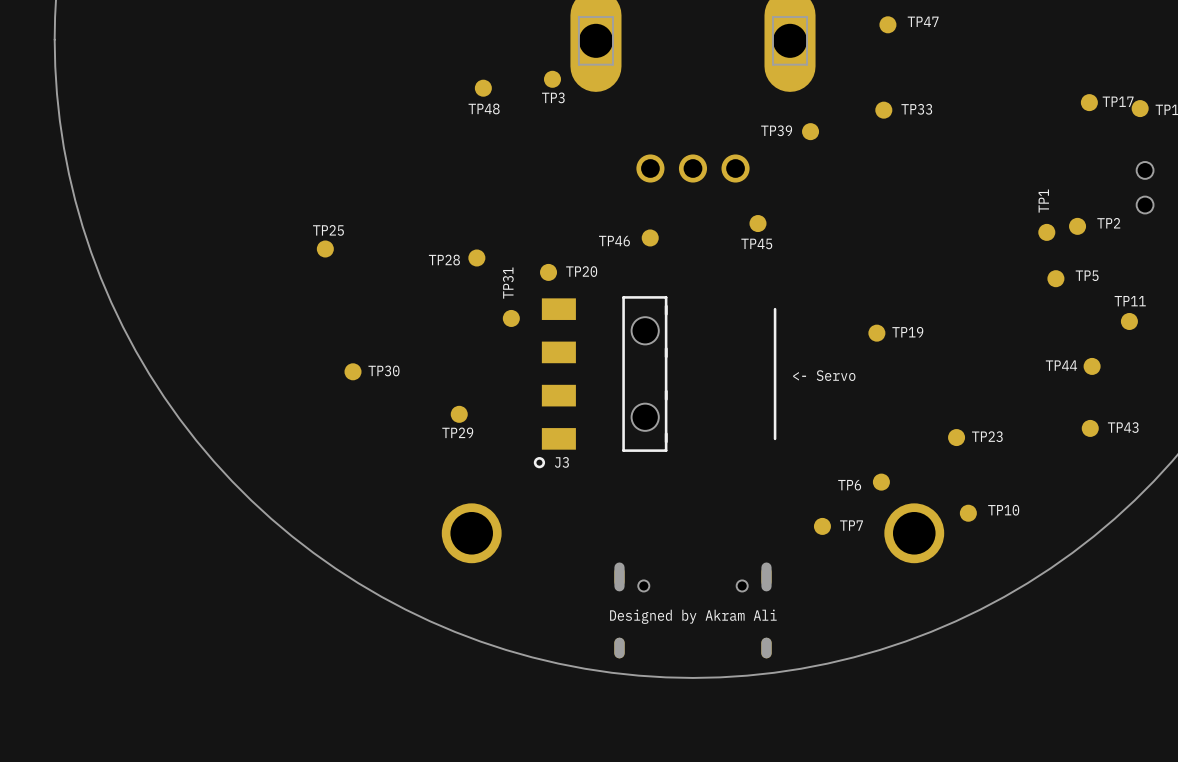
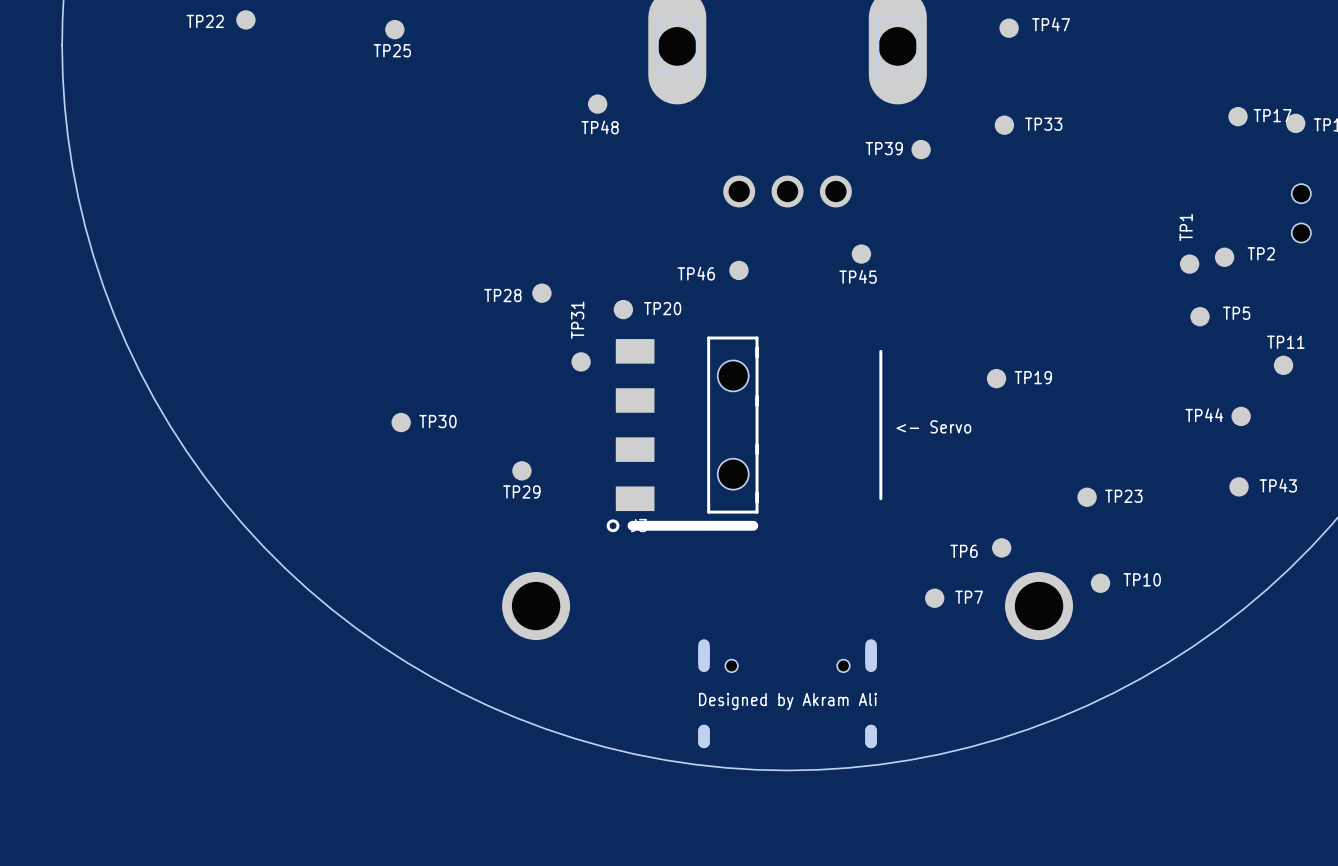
TP22: none -> (245, 19)
TP3: (552, 79) -> none
TP48 position: (483, 88) -> (597, 104)
TP25 name position: TP25 (328, 230) -> TP25 (392, 50)
TP25 position: (325, 249) -> (394, 29)
line: none -> (753, 525) (632, 525)

